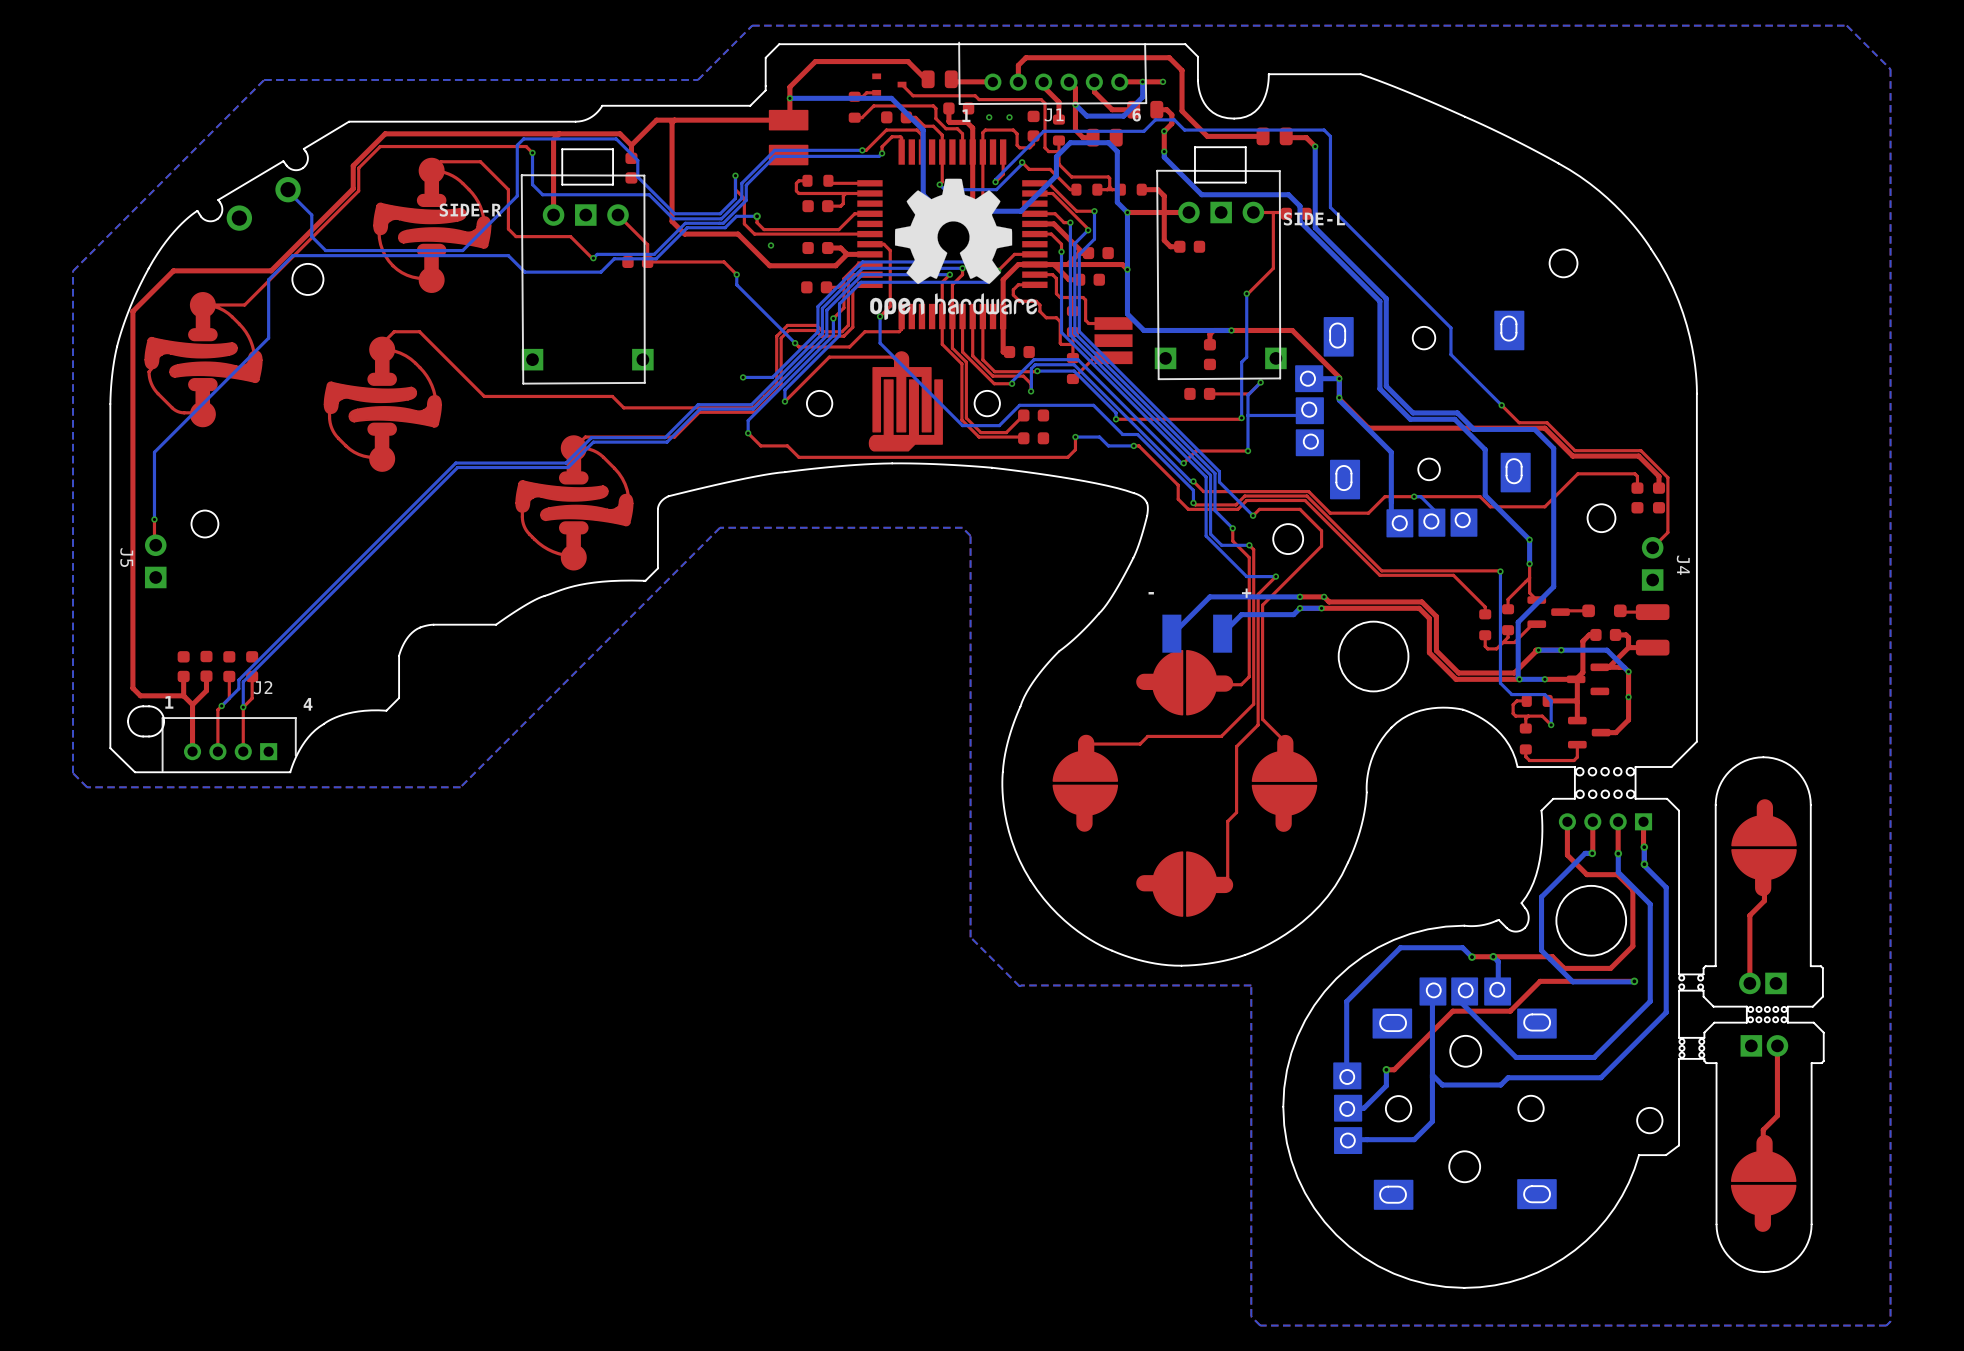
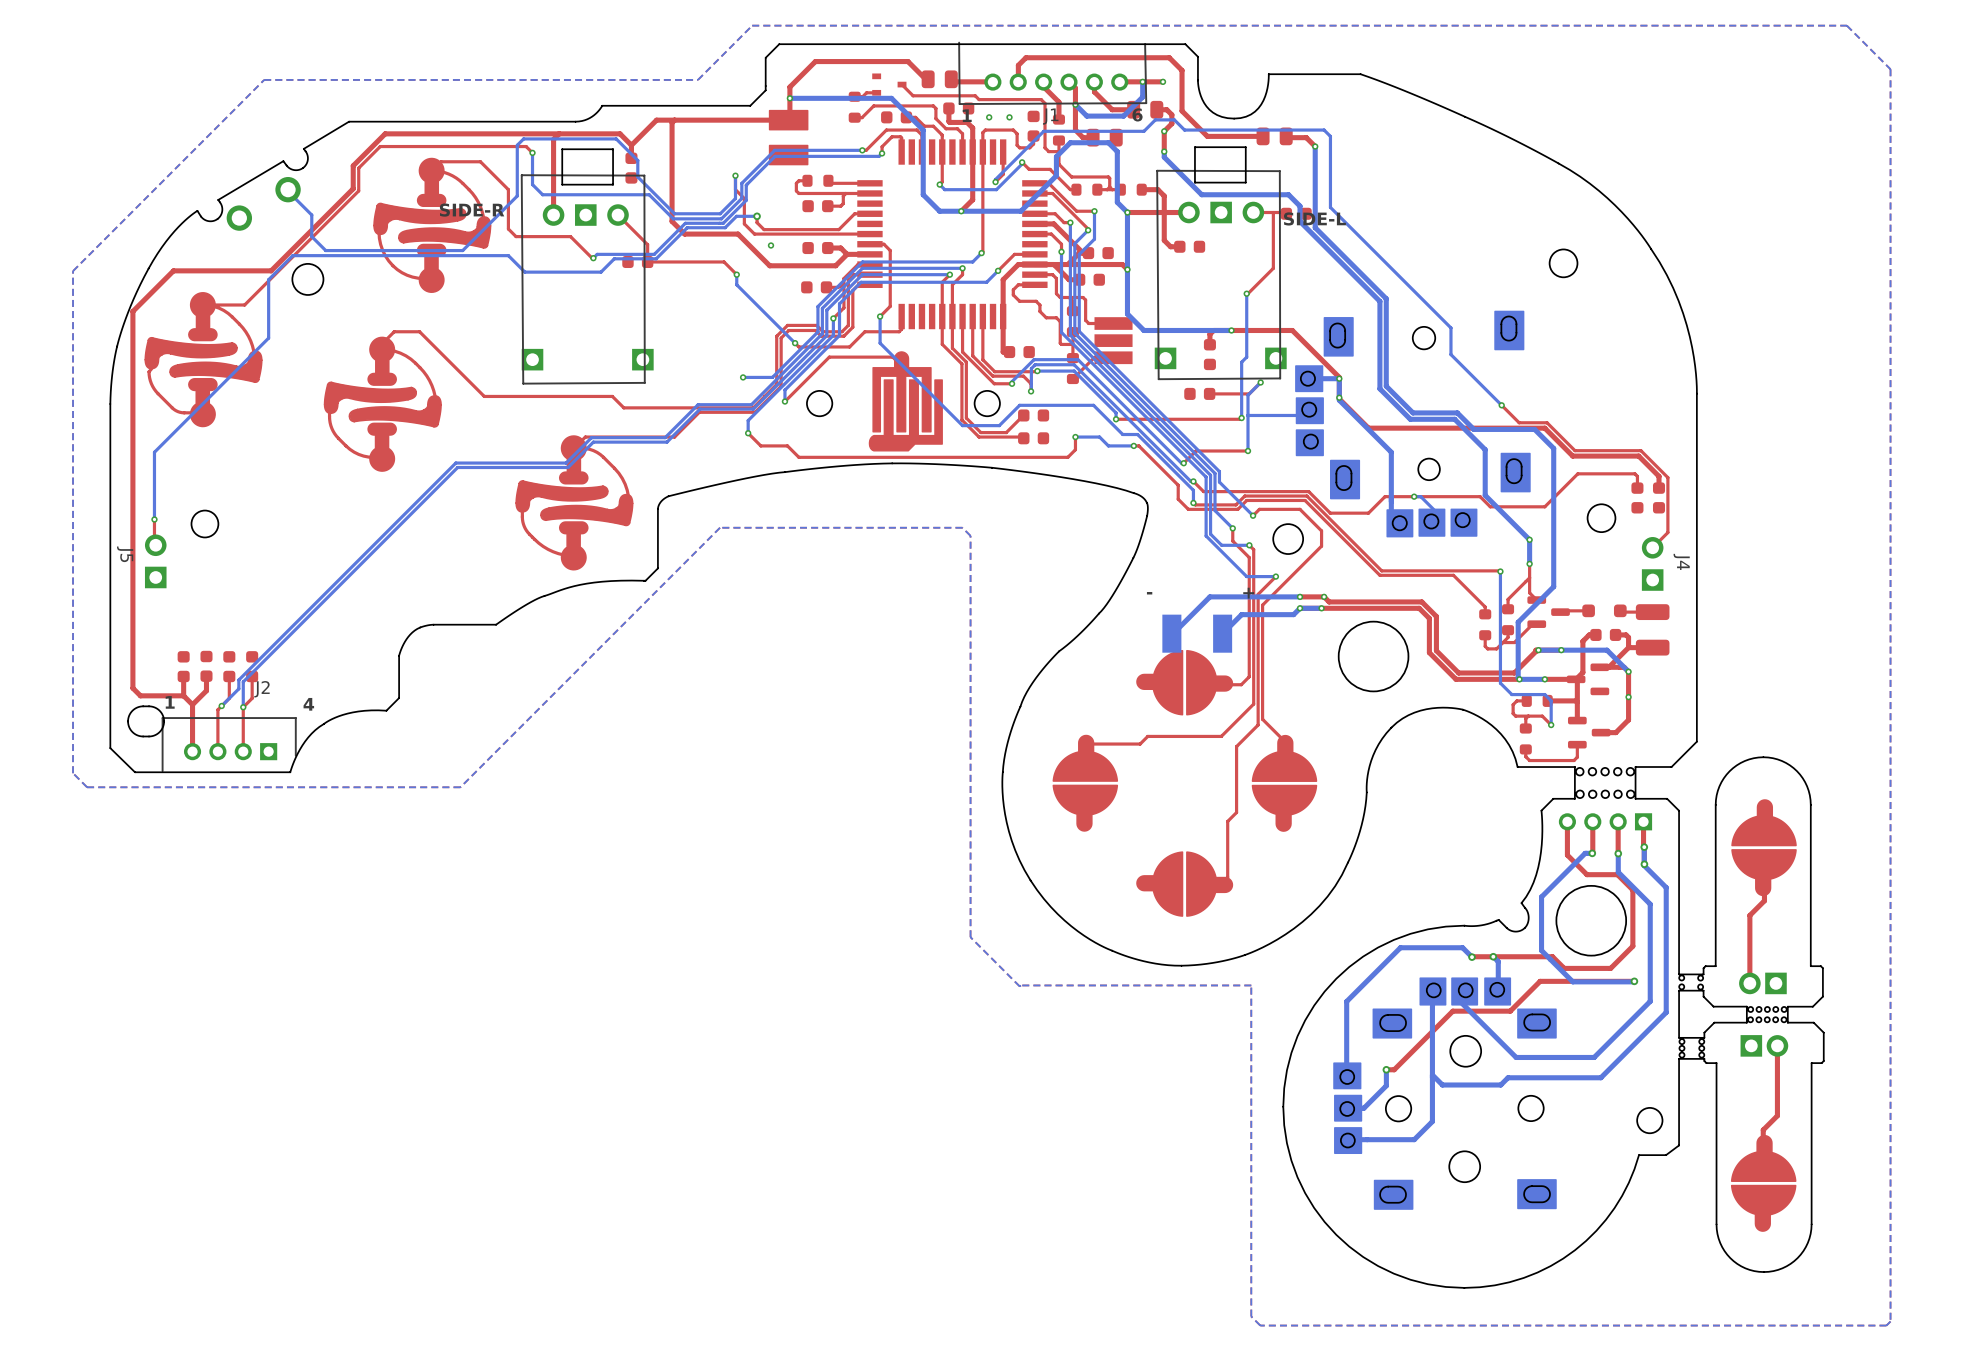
drawing: [870, 178, 1037, 320] -> none

